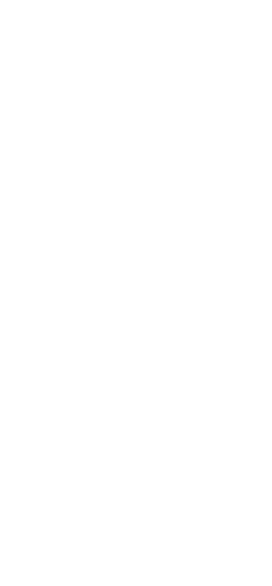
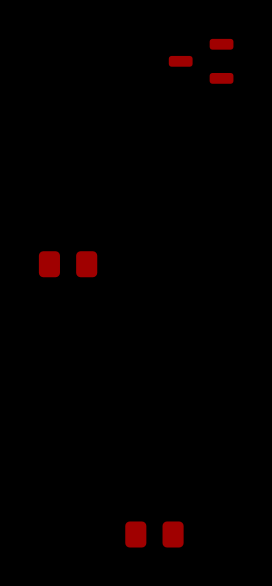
part: none -> (201, 61)
part: none -> (68, 264)
part: none -> (154, 534)

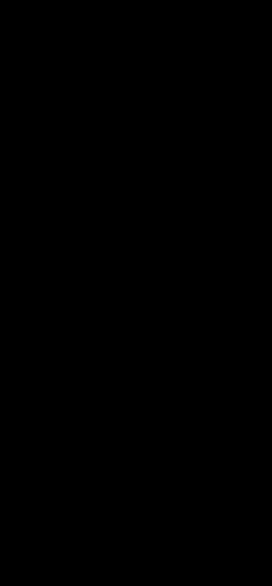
part: (201, 61) -> none
part: (68, 264) -> none
part: (154, 534) -> none

